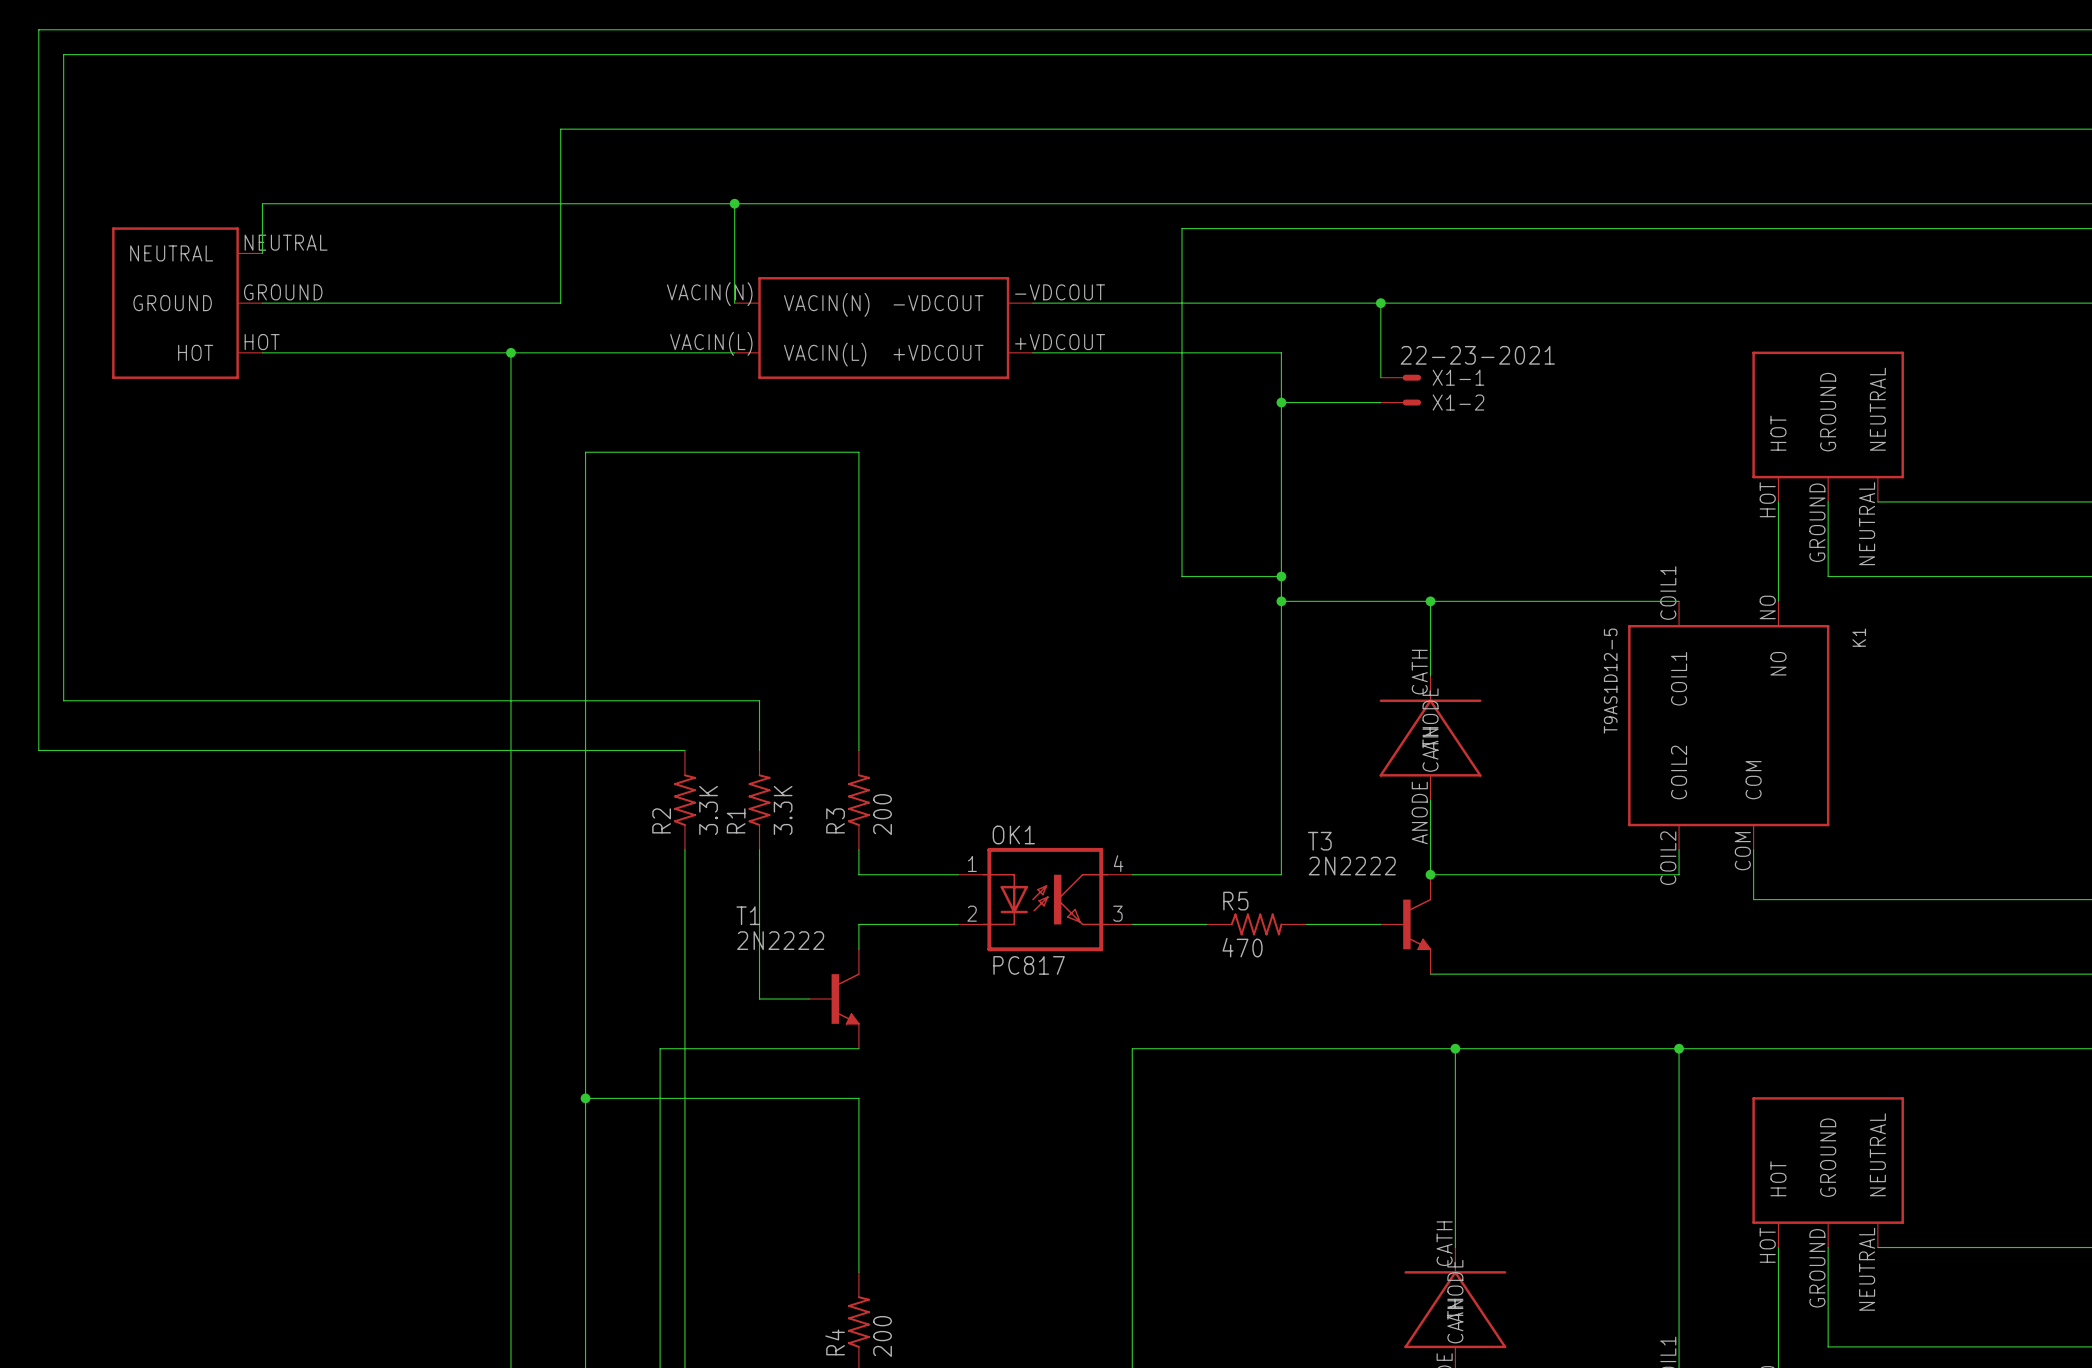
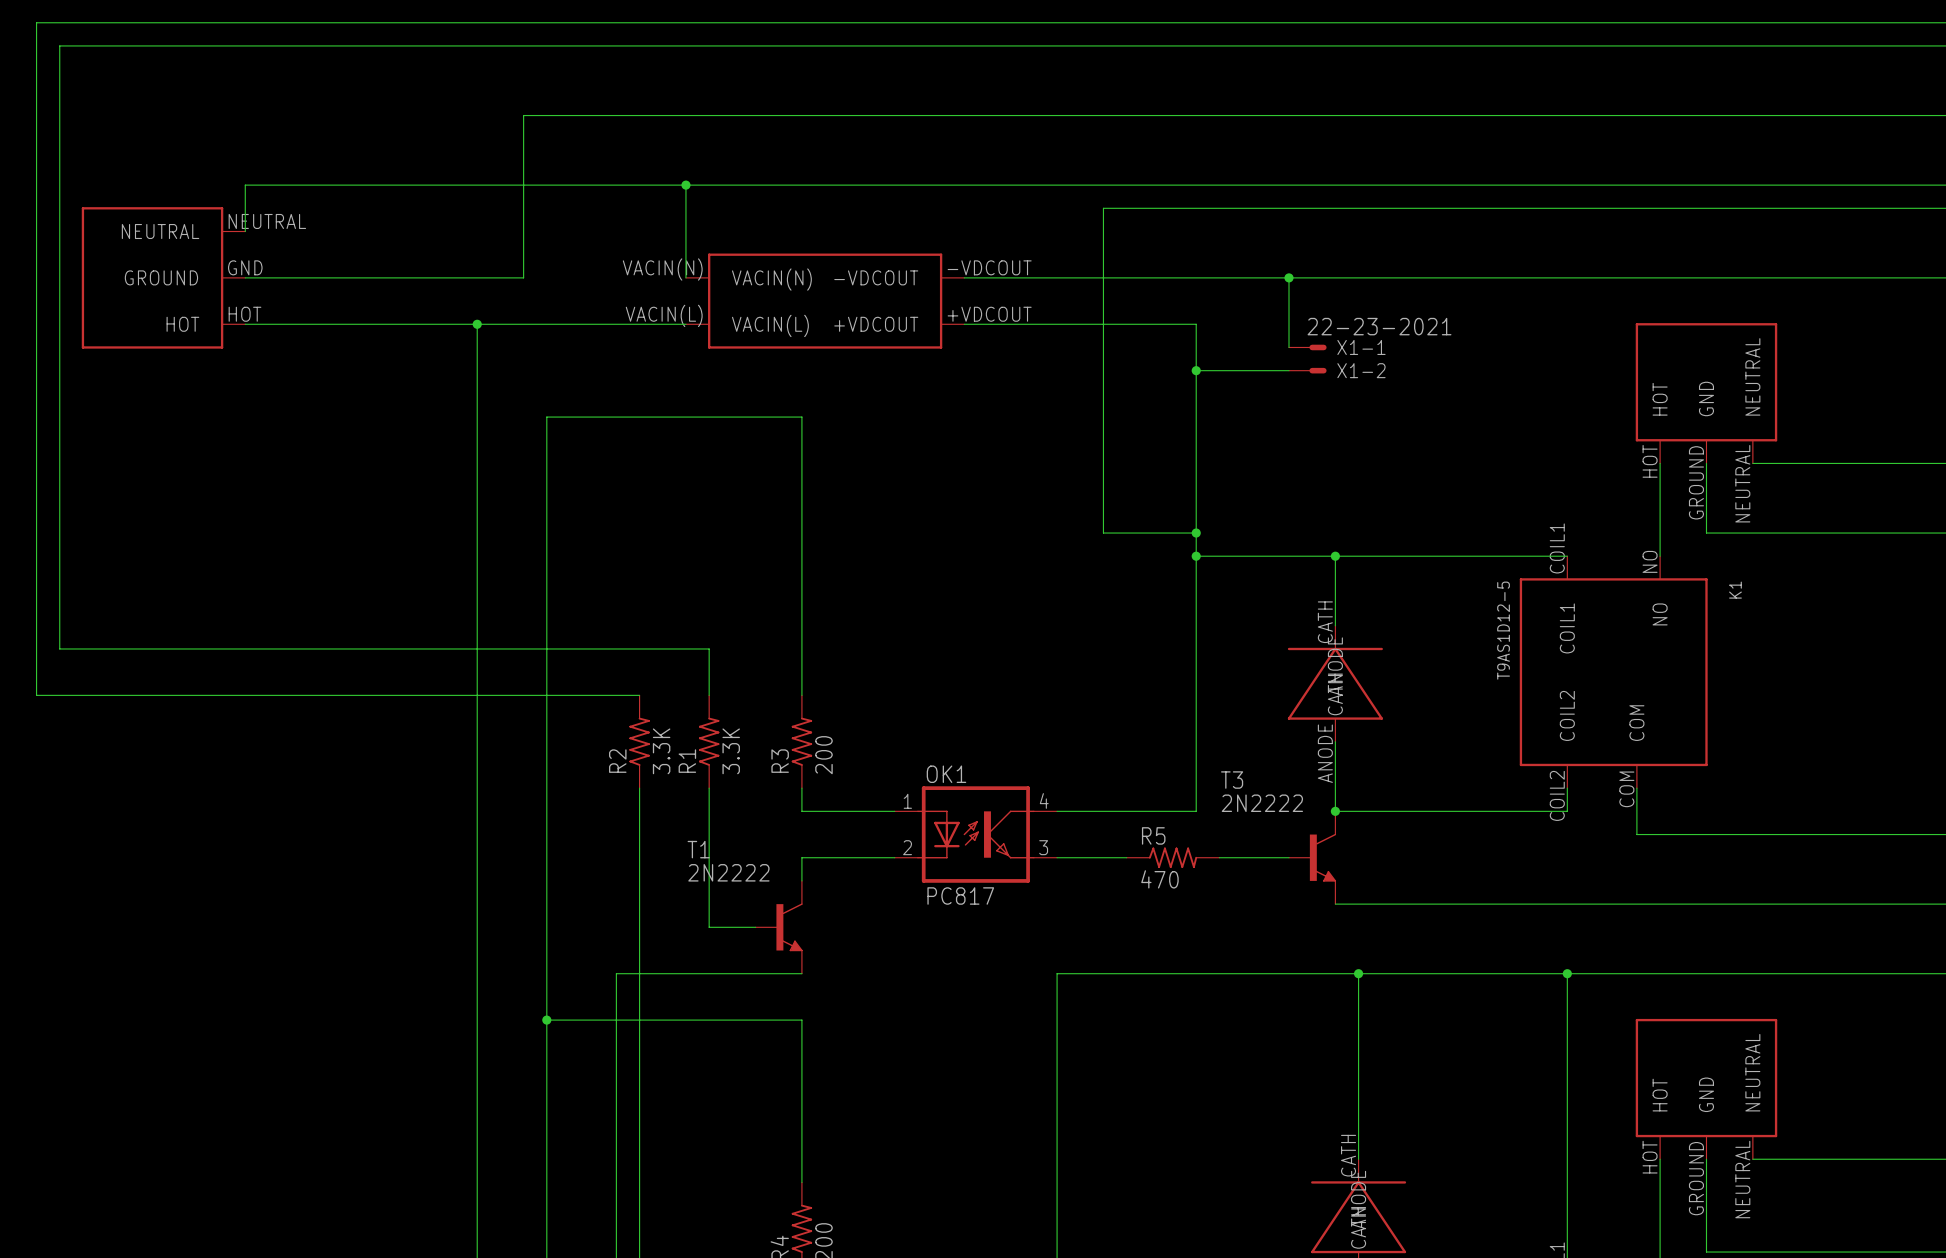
part: none -> (163, 277)
part: (187, 303) -> none
part pin name: GROUND (1828, 412) -> GND (1706, 398)
part pin name: GROUND (1828, 1157) -> GND (1706, 1094)

